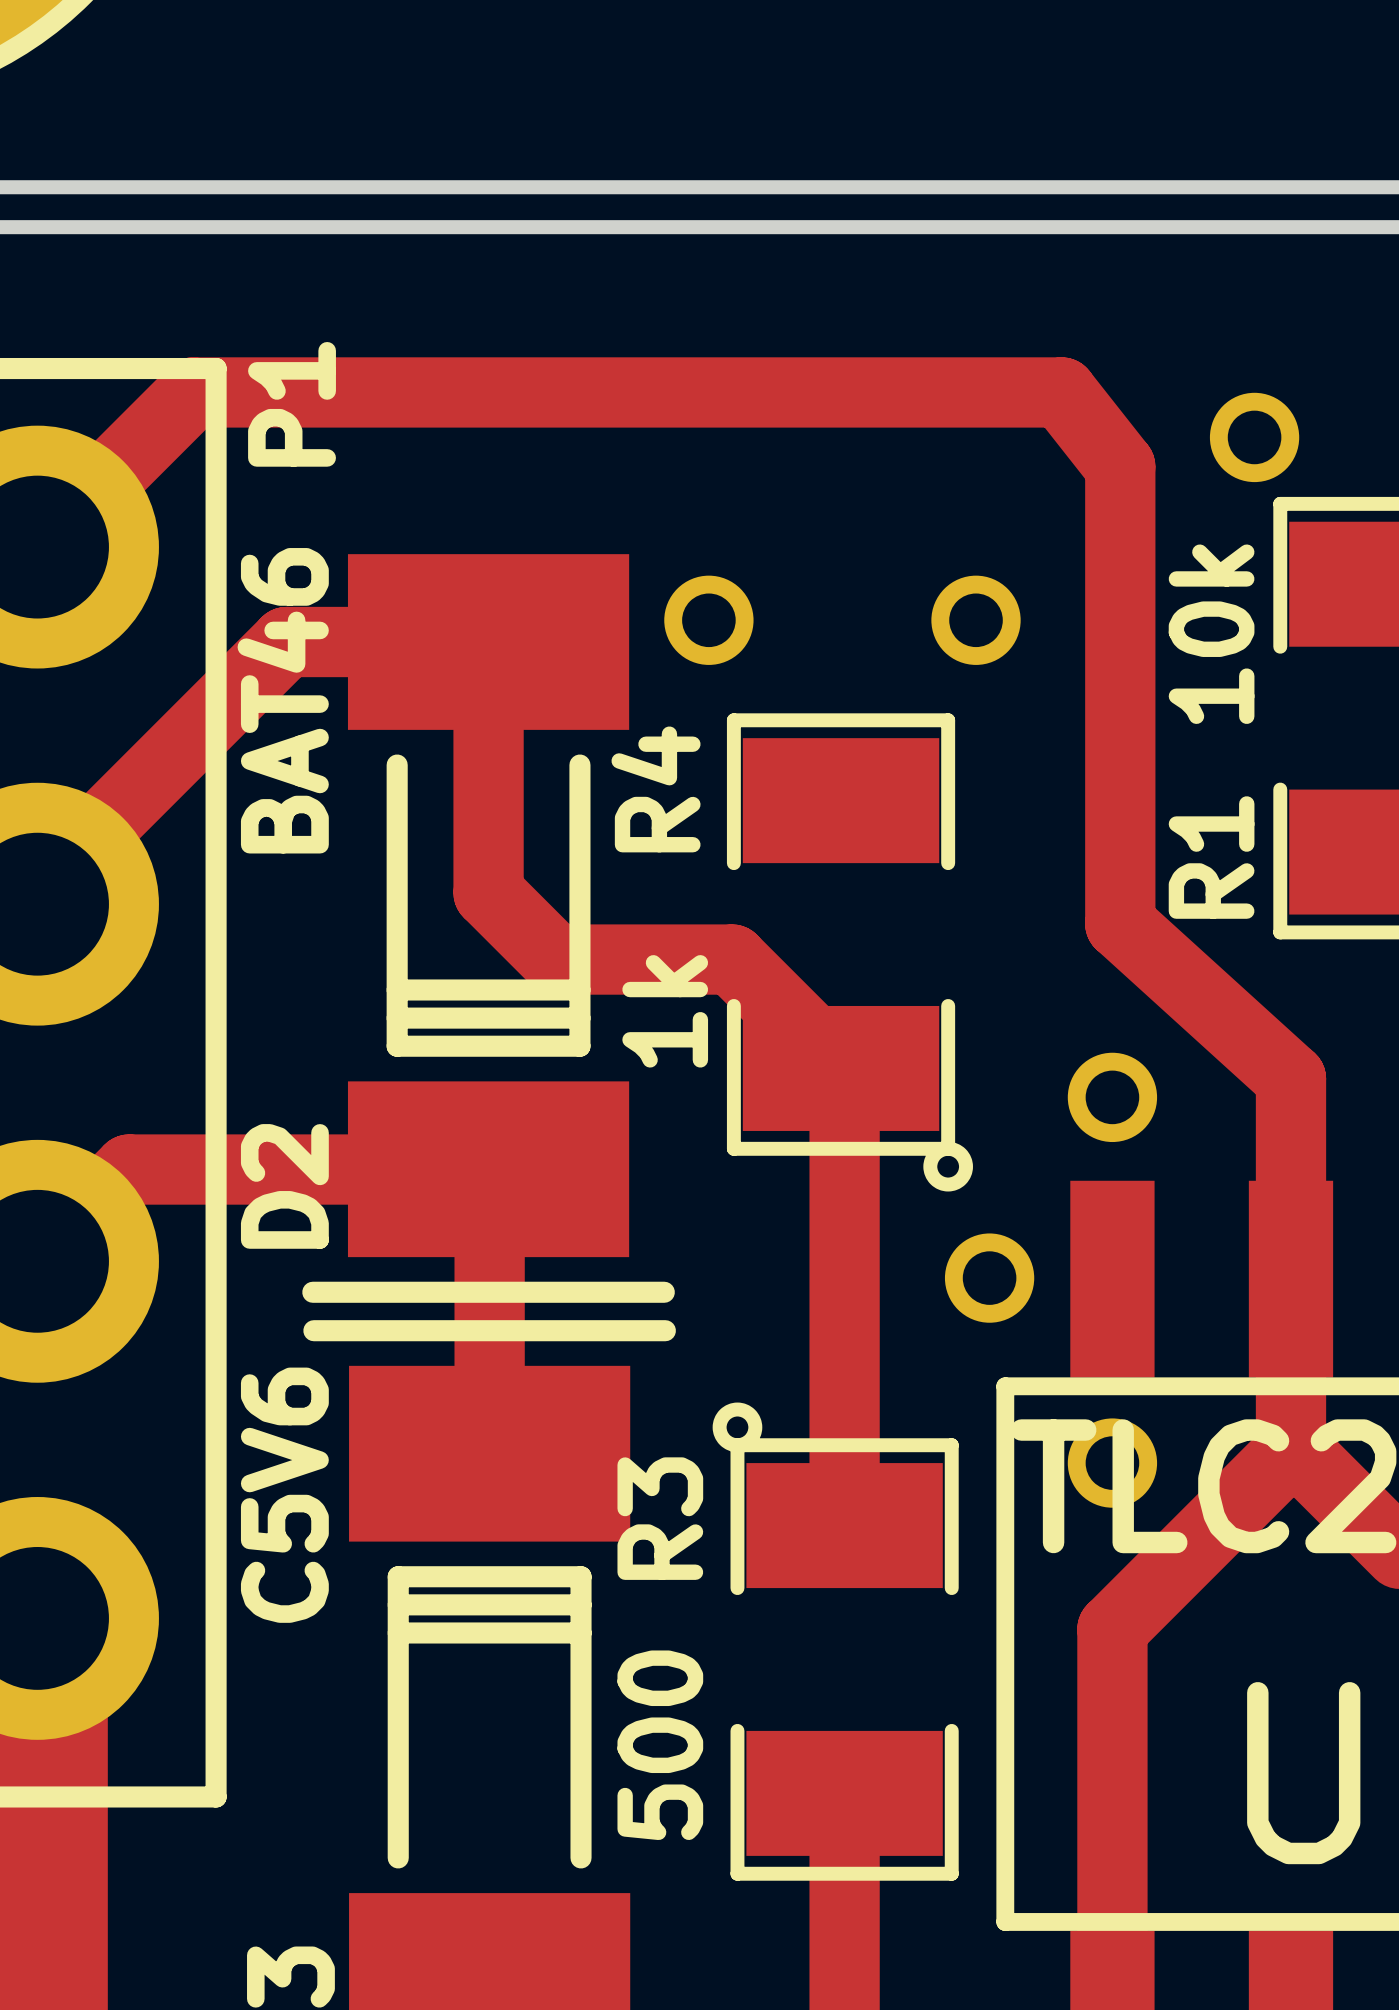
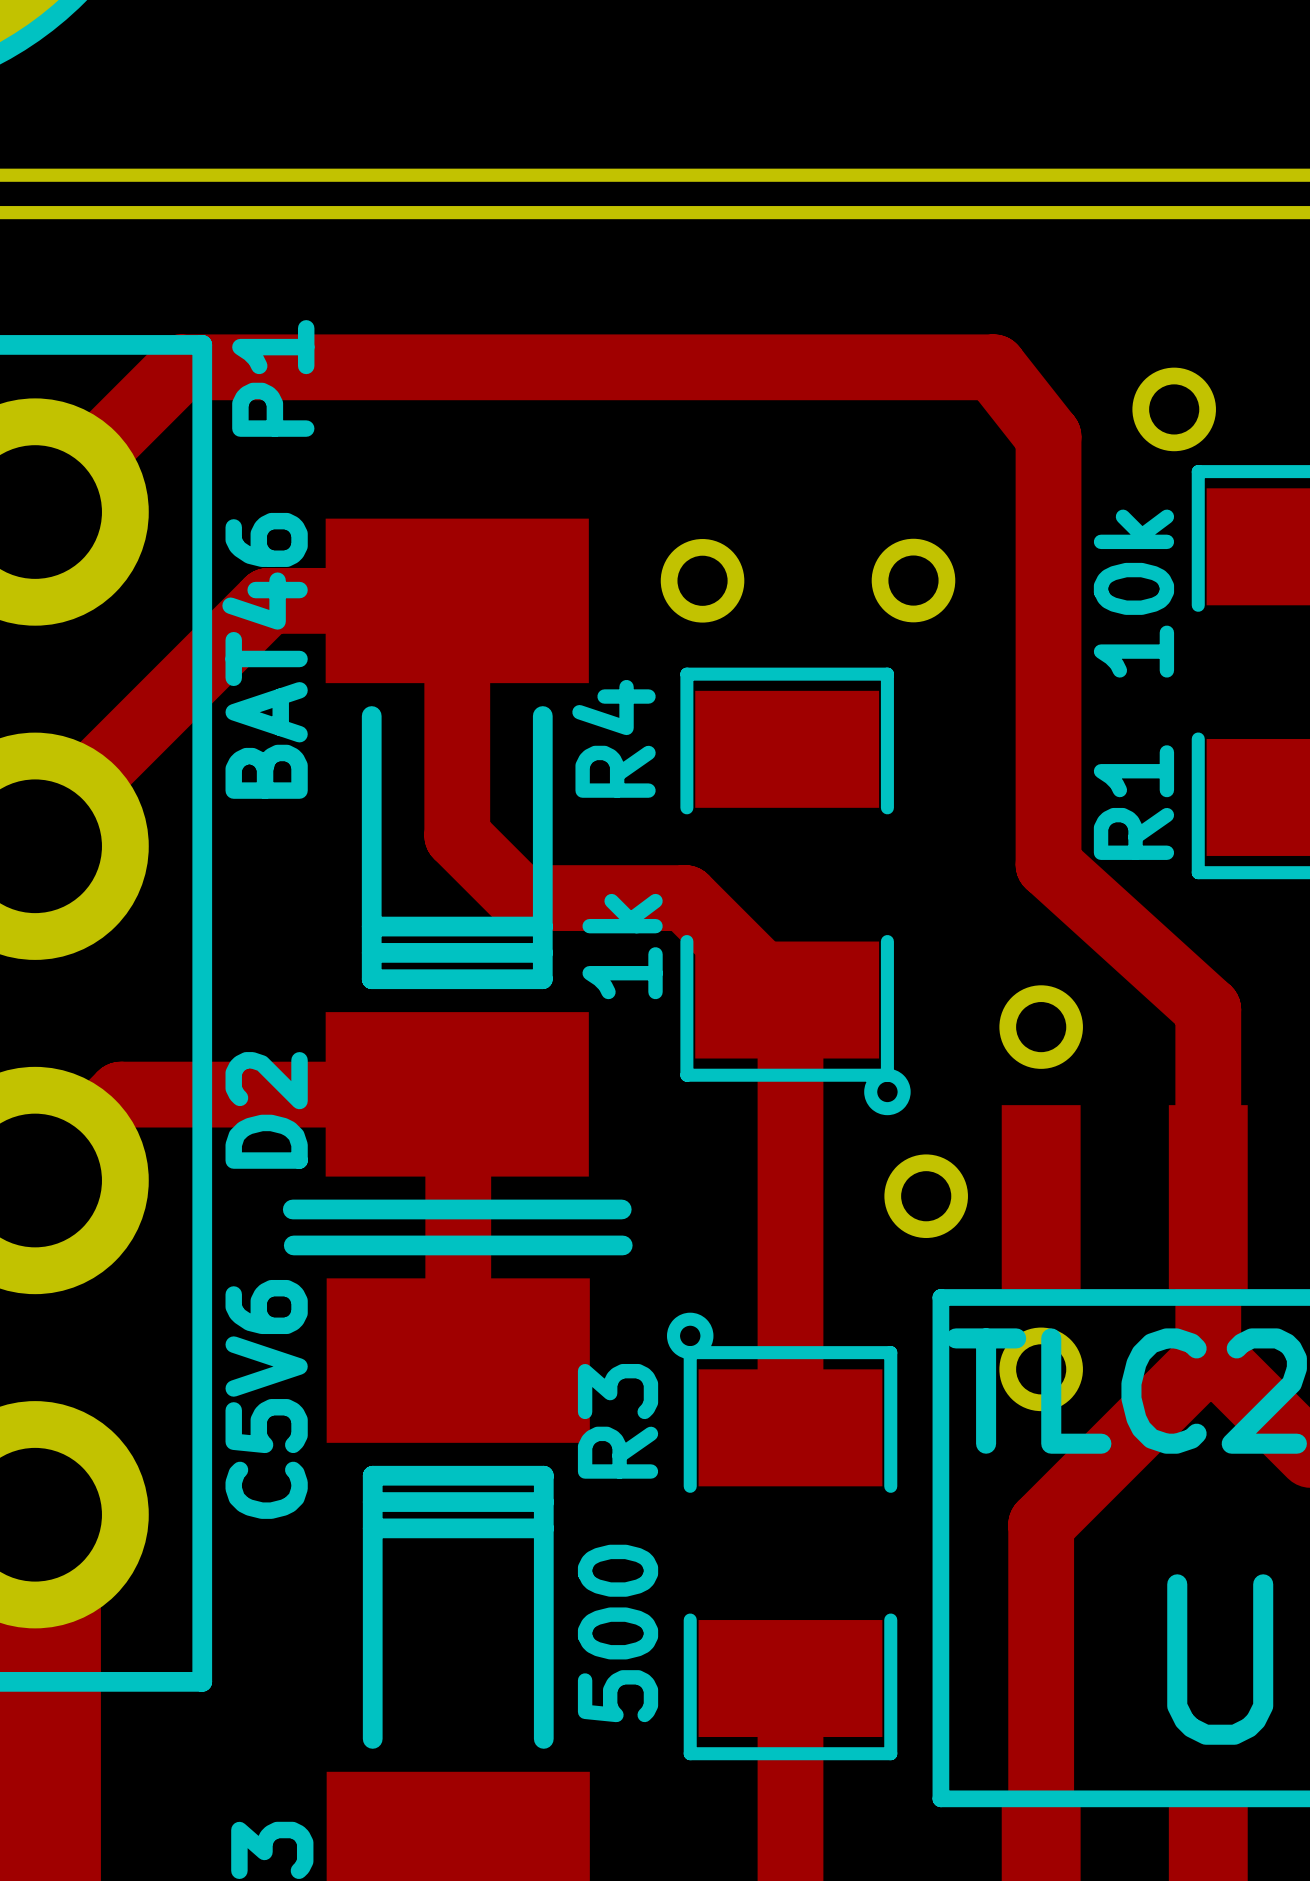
part position: (708, 620) -> (702, 580)

